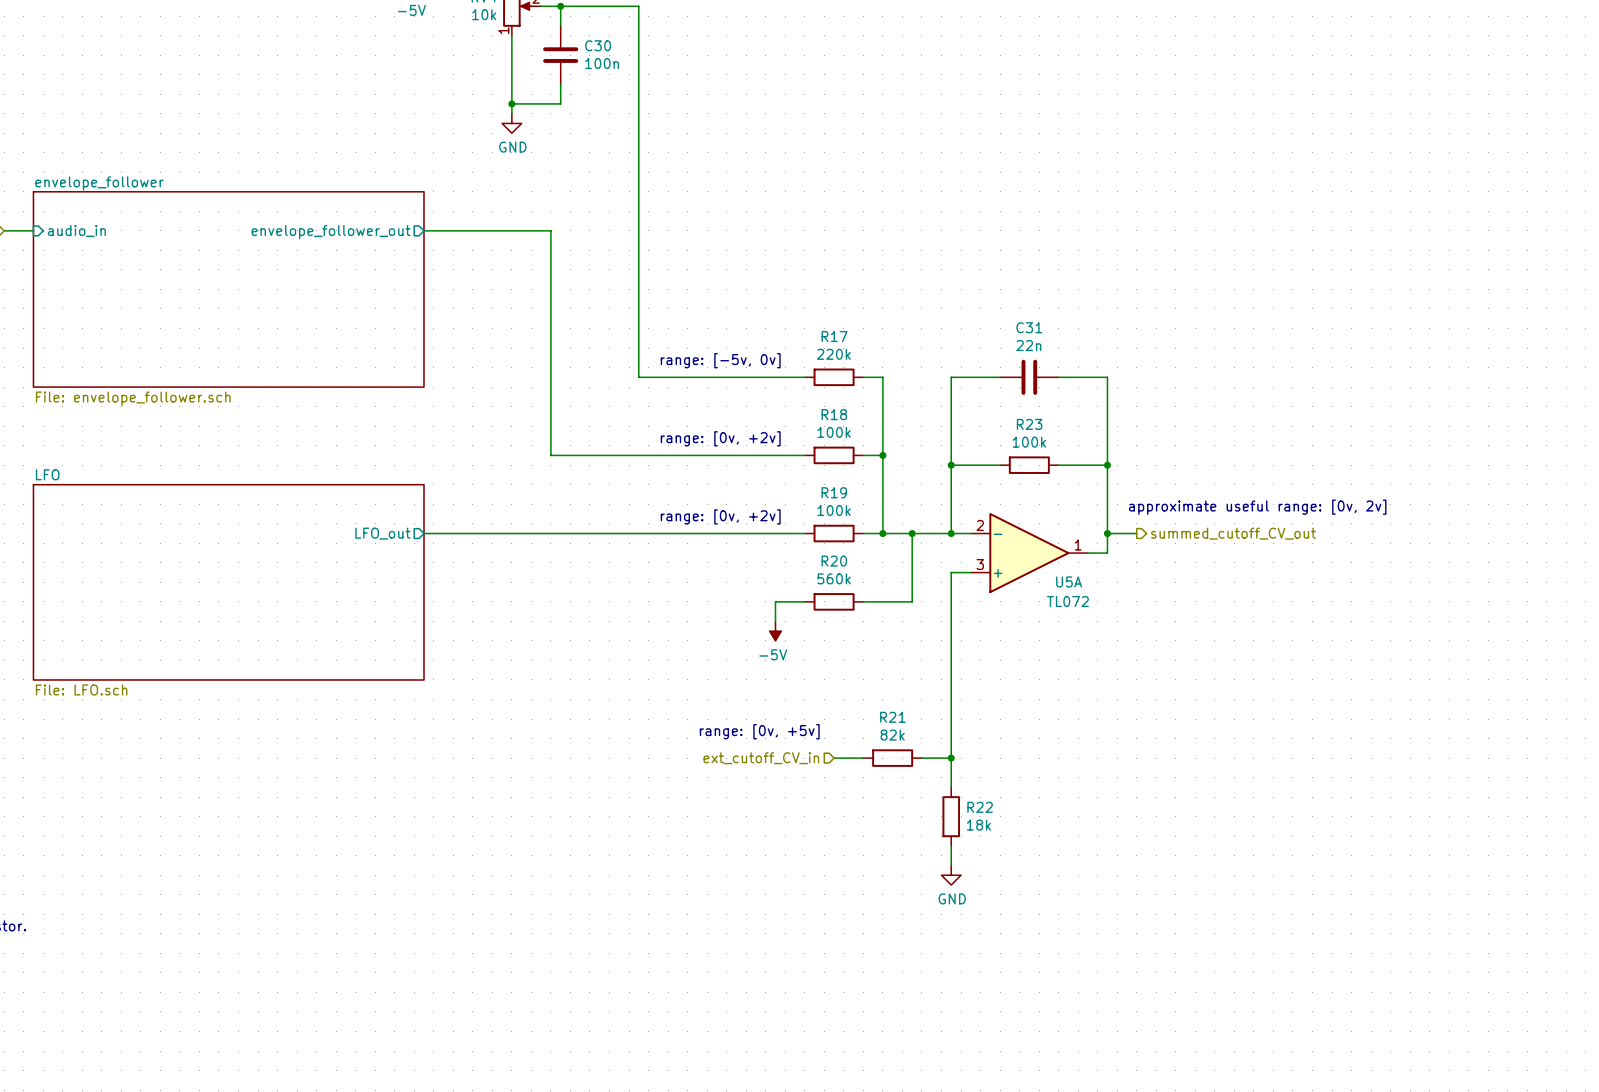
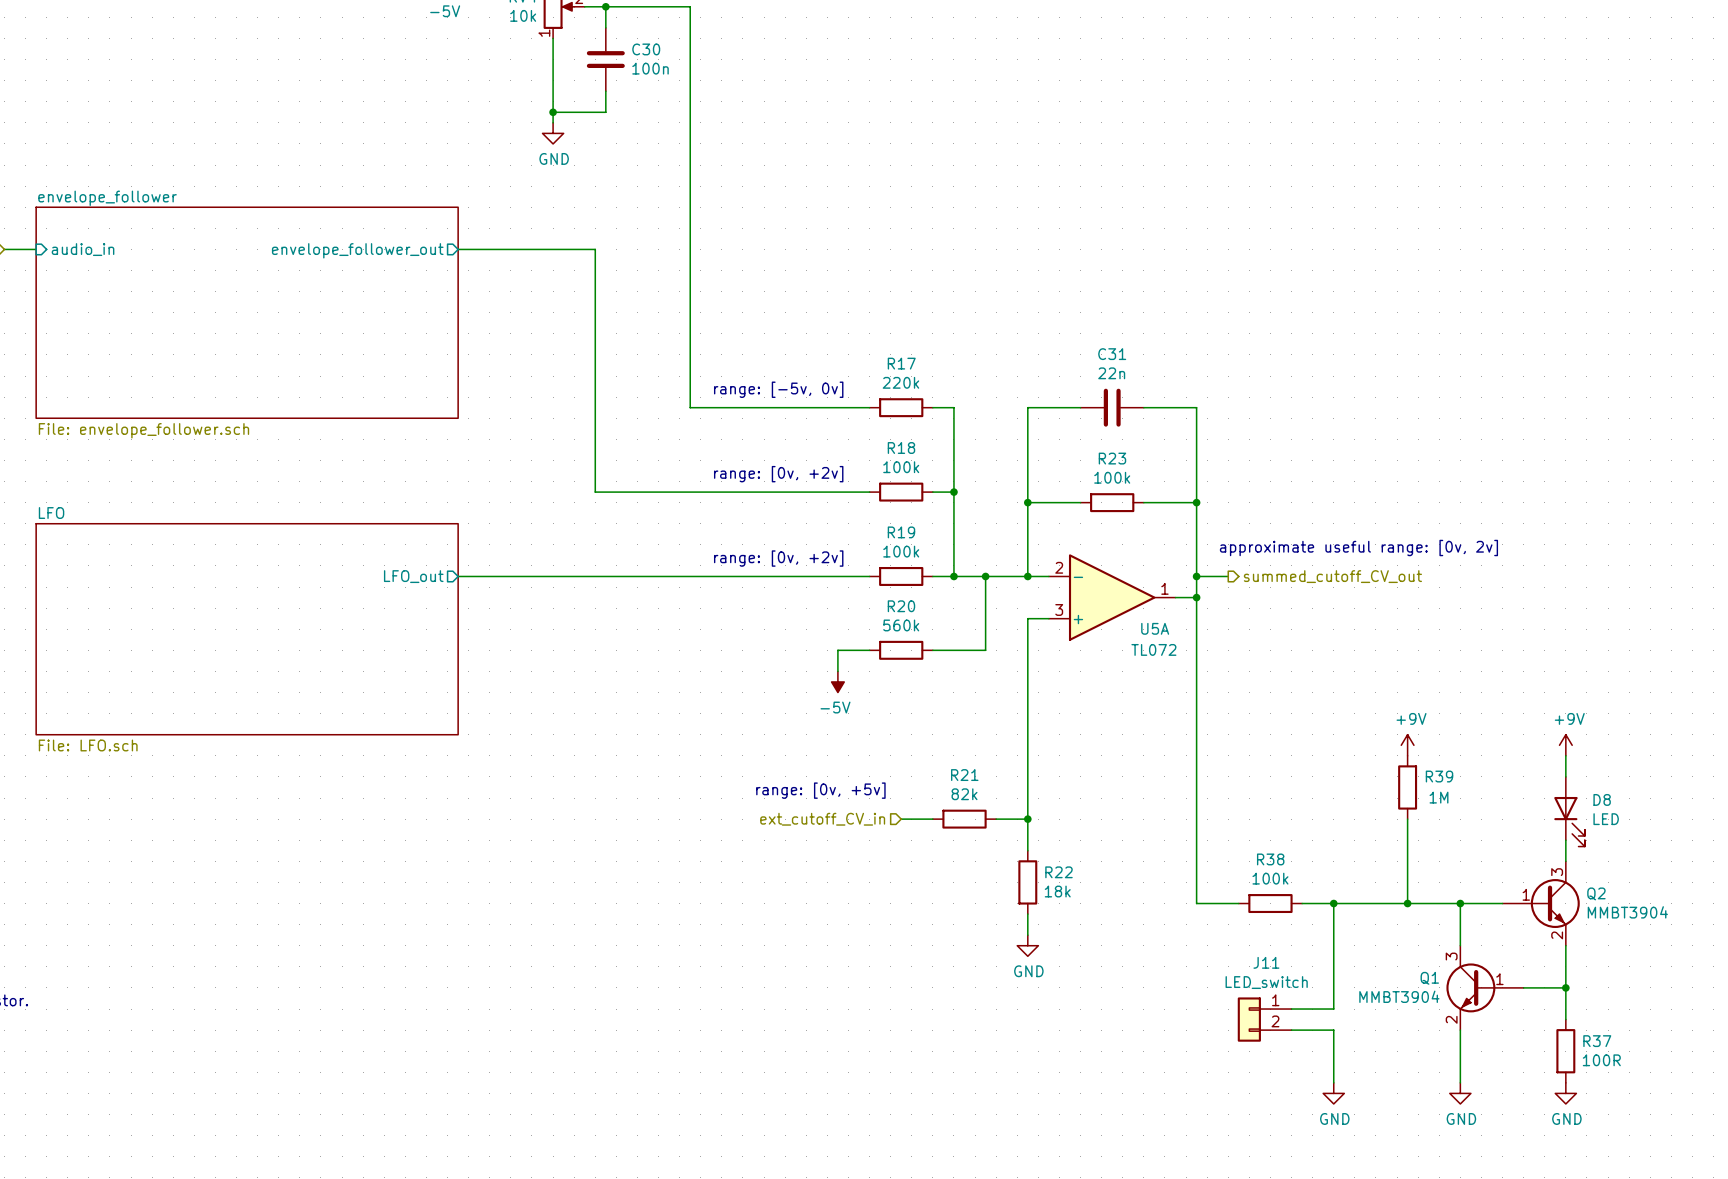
wire: none -> (1196, 597) (1196, 903) (1238, 903)
junction: none -> (1196, 597)
power symbol: none -> +9V (1407, 745)
power symbol: none -> +9V (1565, 745)
wire: none -> (1565, 755) (1565, 776)
R39: none -> 1M (1407, 787)
D8: none -> LED (1569, 811)
wire: none -> (1407, 819) (1407, 903)
wire: none -> (1565, 840) (1565, 861)
R38: none -> 100k (1270, 903)
wire: none -> (1302, 903) (1502, 903)
wire: none -> (1333, 903) (1333, 1009) (1291, 1009)
junction: none -> (1333, 903)
junction: none -> (1407, 903)
wire: none -> (1460, 903) (1460, 945)
junction: none -> (1460, 903)
Q2: none -> MMBT3904 (1541, 903)
wire: none -> (1565, 945) (1565, 1019)
Q1: none -> MMBT3904 (1485, 987)
wire: none -> (1523, 987) (1565, 987)
junction: none -> (1565, 987)
J11: none -> LED_switch (1264, 1019)
wire: none -> (1291, 1030) (1333, 1030) (1333, 1082)
wire: none -> (1460, 1030) (1460, 1082)
R37: none -> 100R (1565, 1051)
power symbol: none -> GND (1333, 1093)
power symbol: none -> GND (1460, 1093)
power symbol: none -> GND (1565, 1093)

